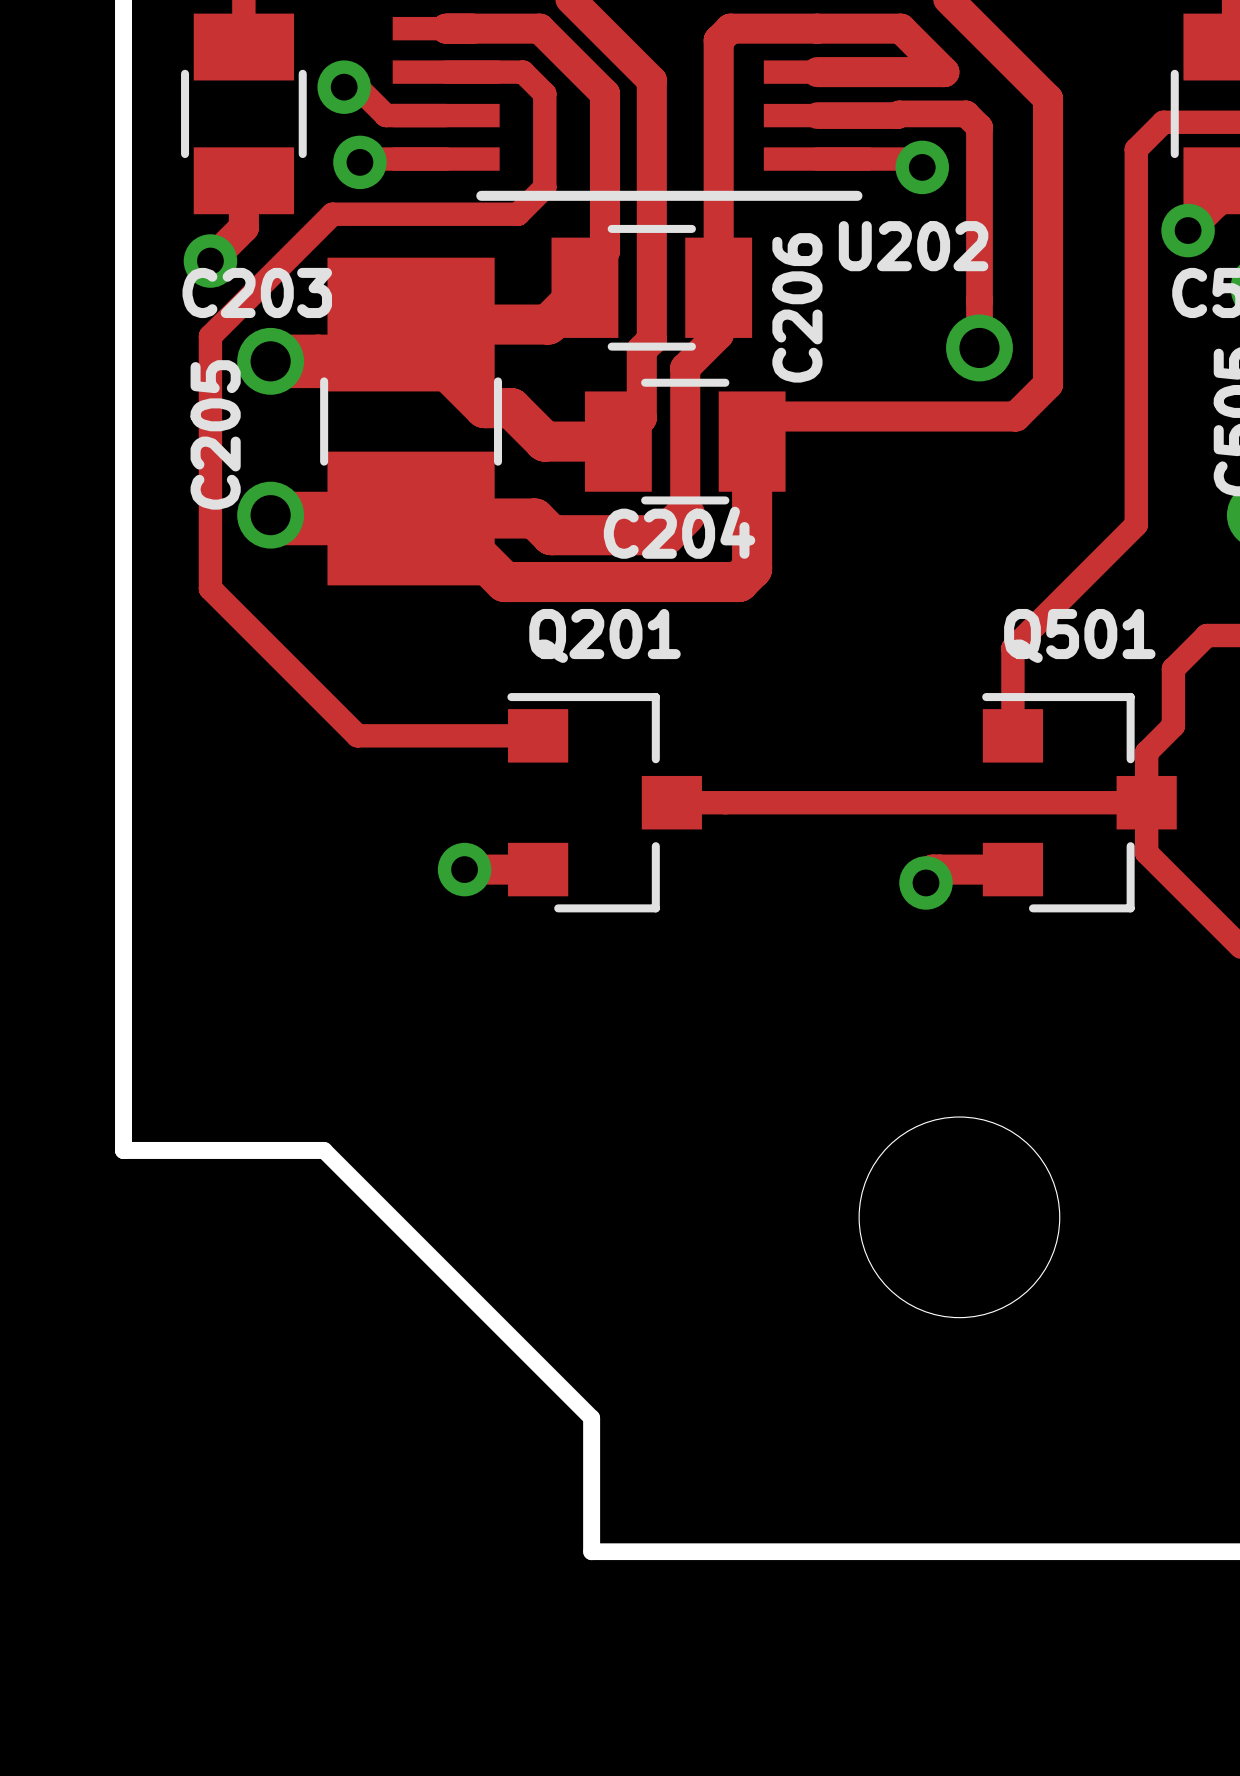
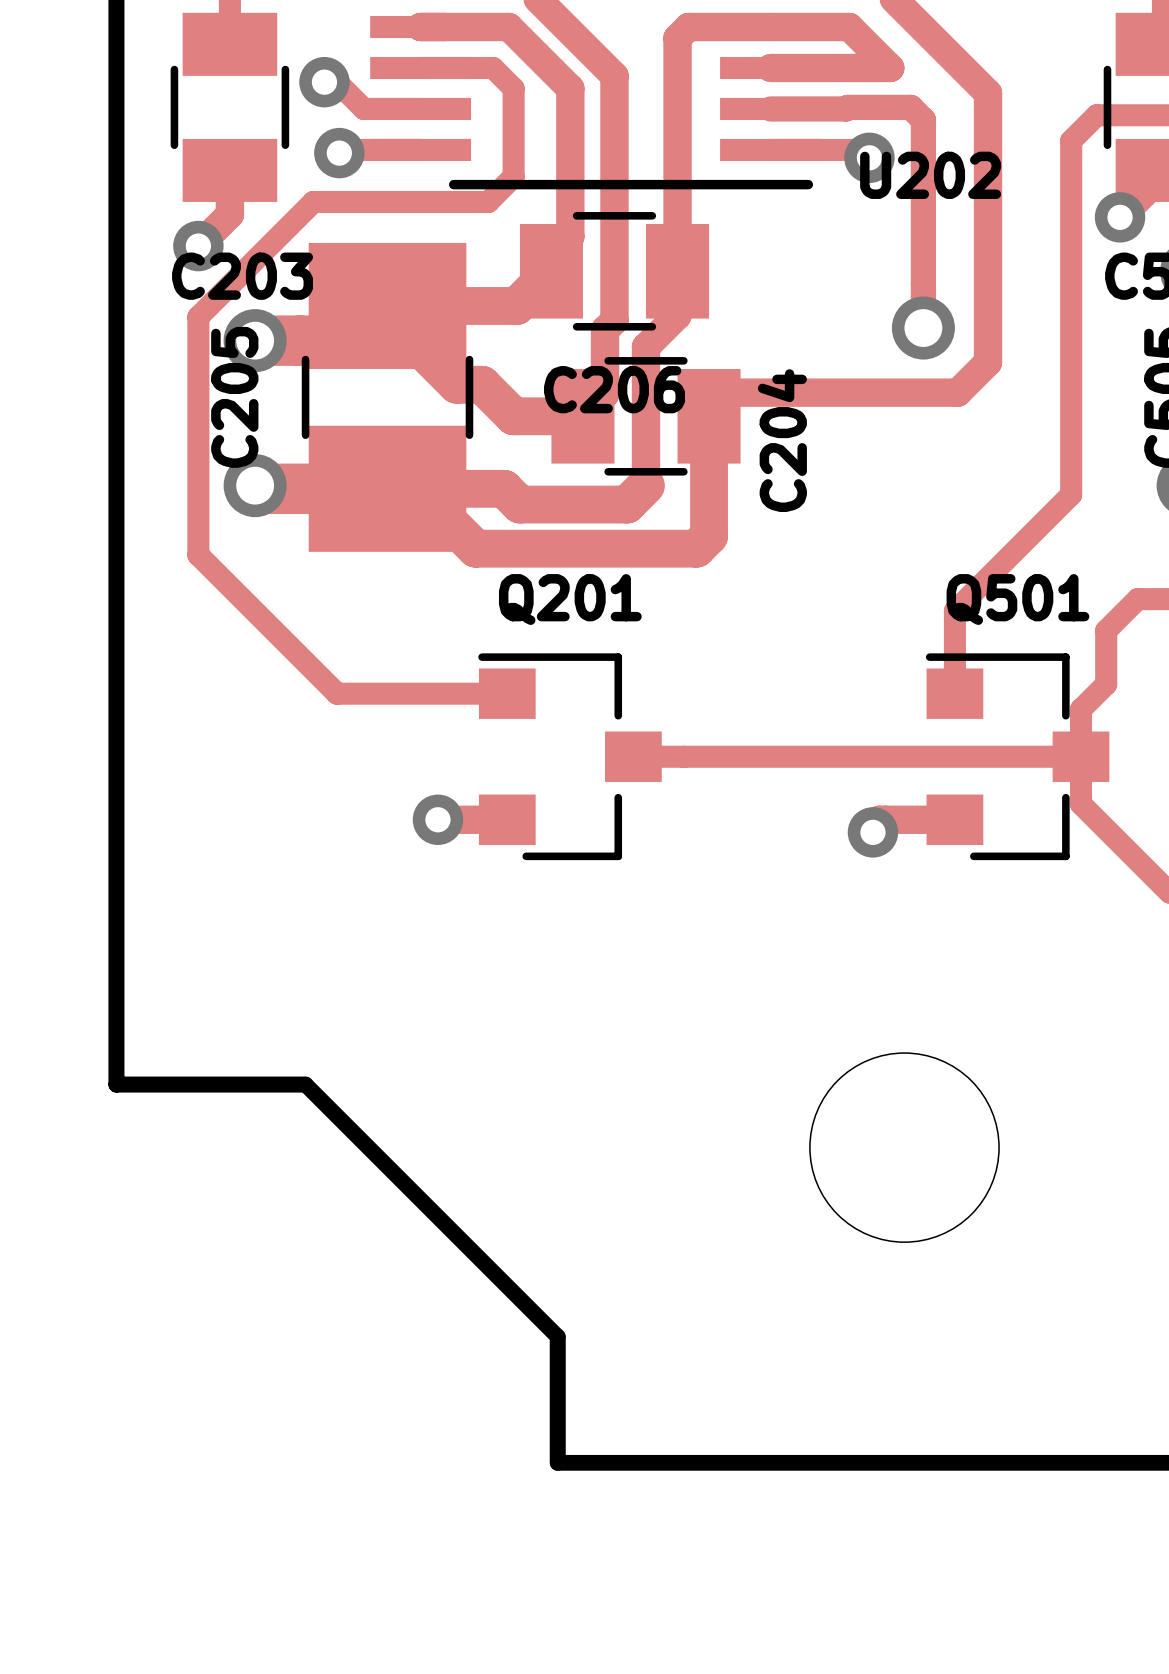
U202 name position: U202 (913, 246) -> U202 (930, 175)
C206 name rotation: 0° (797, 307) -> 90° clockwise (614, 389)
C206 name position: C206 (797, 307) -> C206 (614, 389)
C205 name position: C205 (215, 434) -> C205 (234, 397)
C204 name rotation: 0° (679, 532) -> 90° counterclockwise (782, 440)

